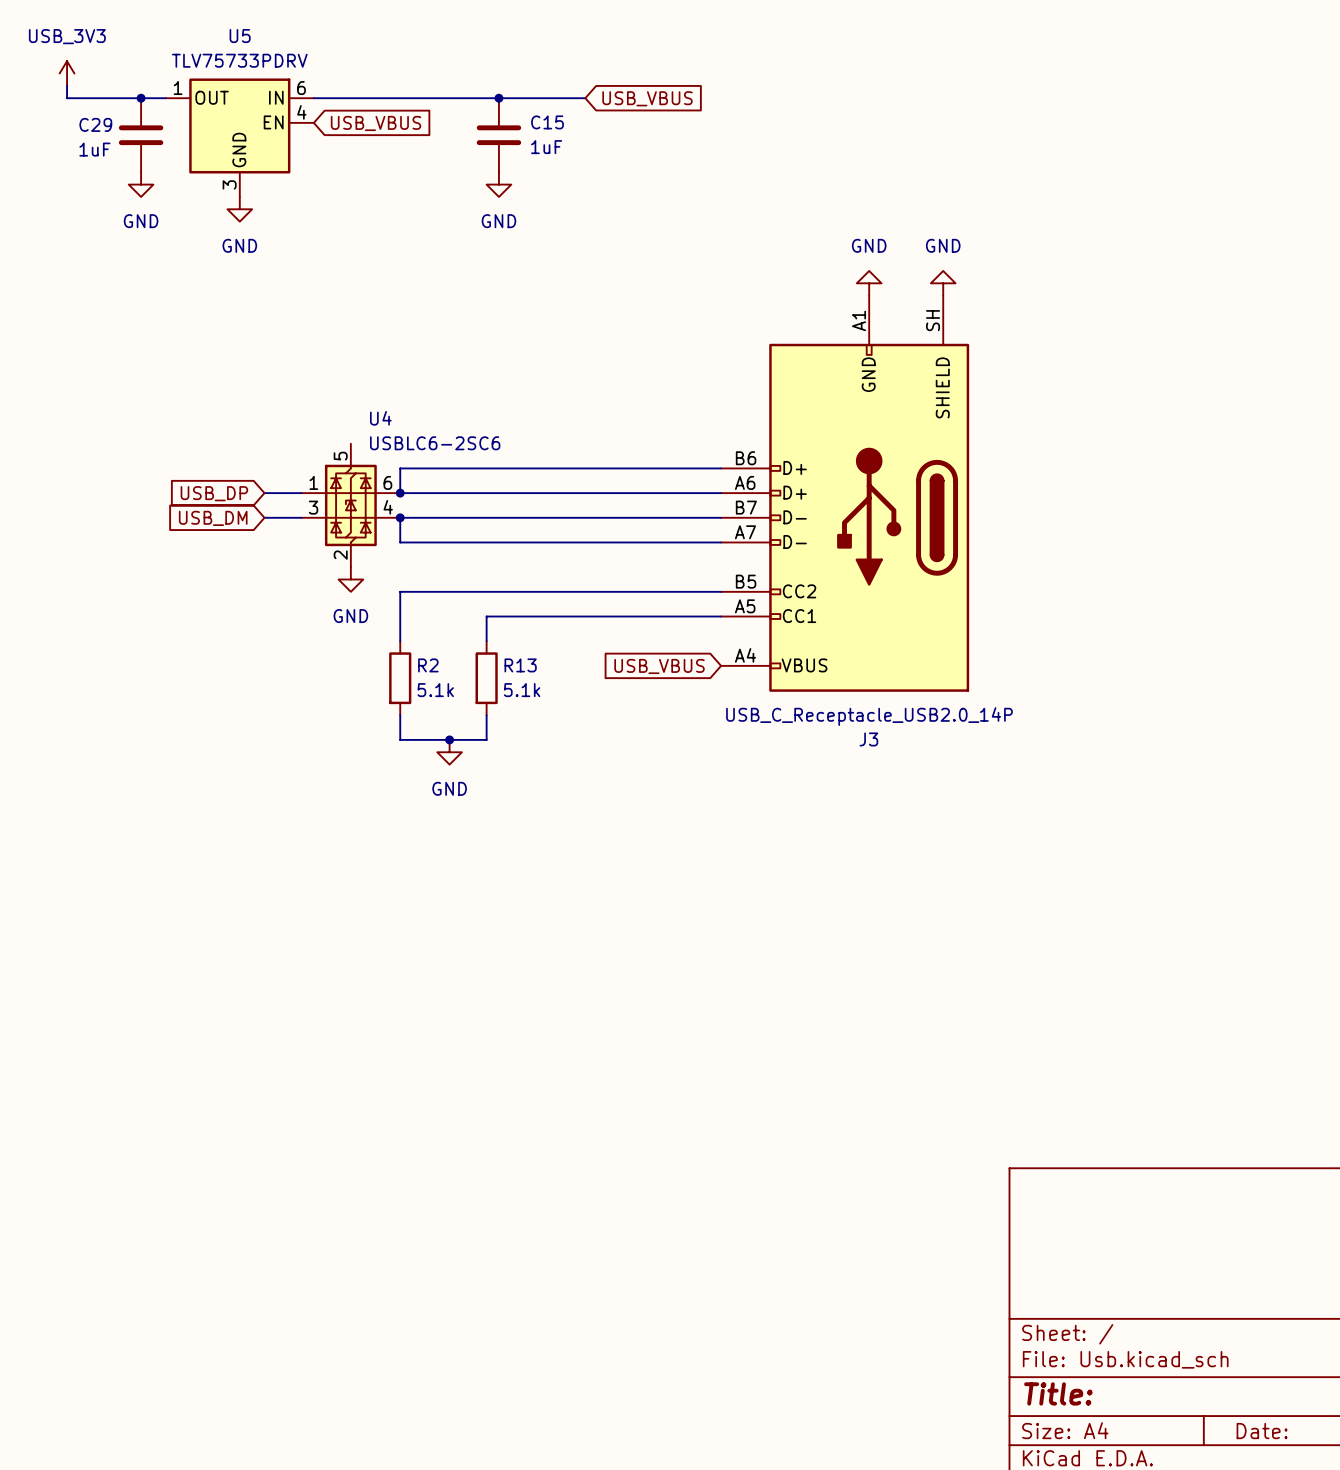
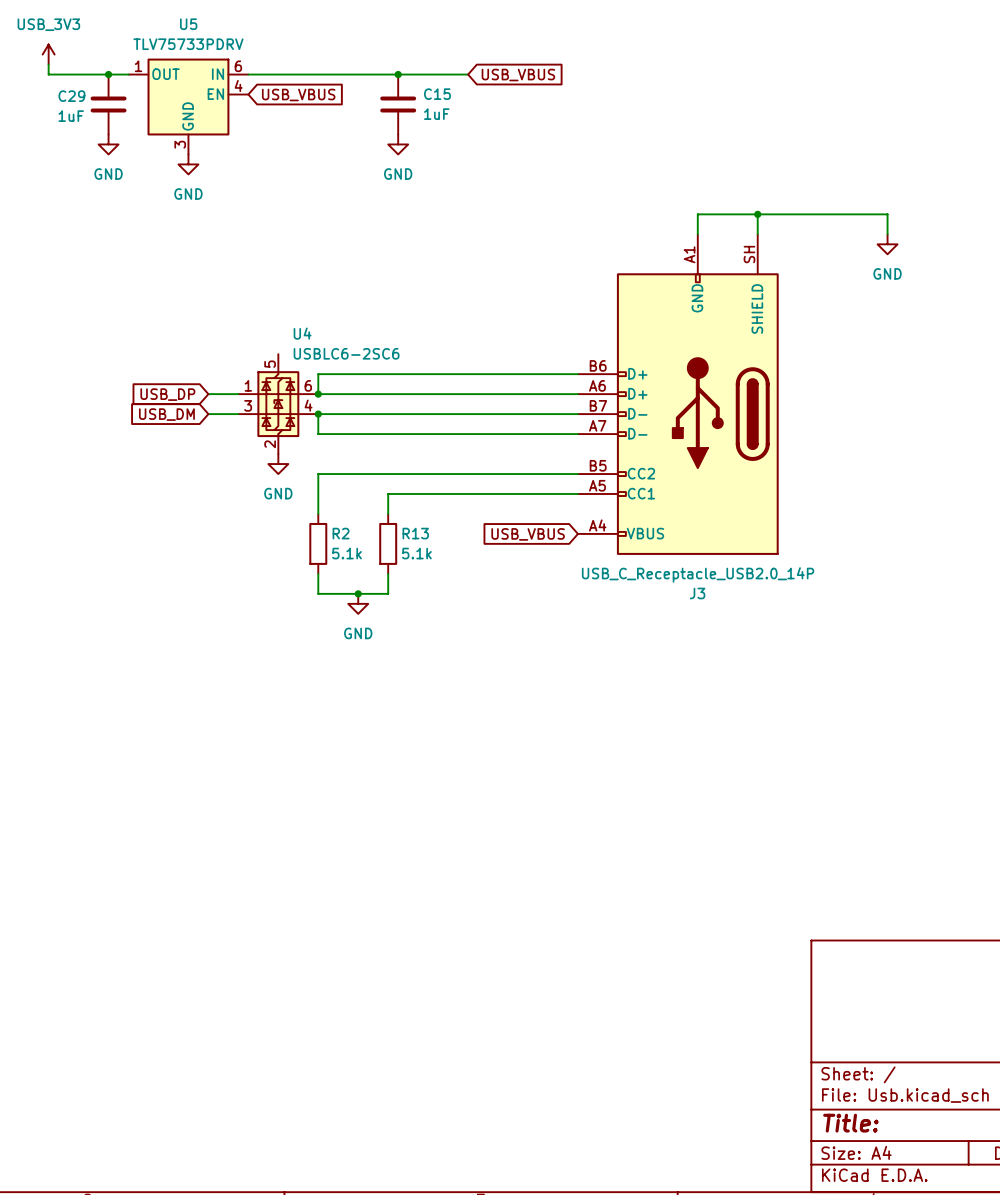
junction: none -> (757, 214)
power symbol: GND (869, 283) -> none
power symbol: GND (943, 283) -> none
wire: none -> (697, 234) (697, 214) (887, 214) (887, 234)
power symbol: none -> GND (887, 244)

